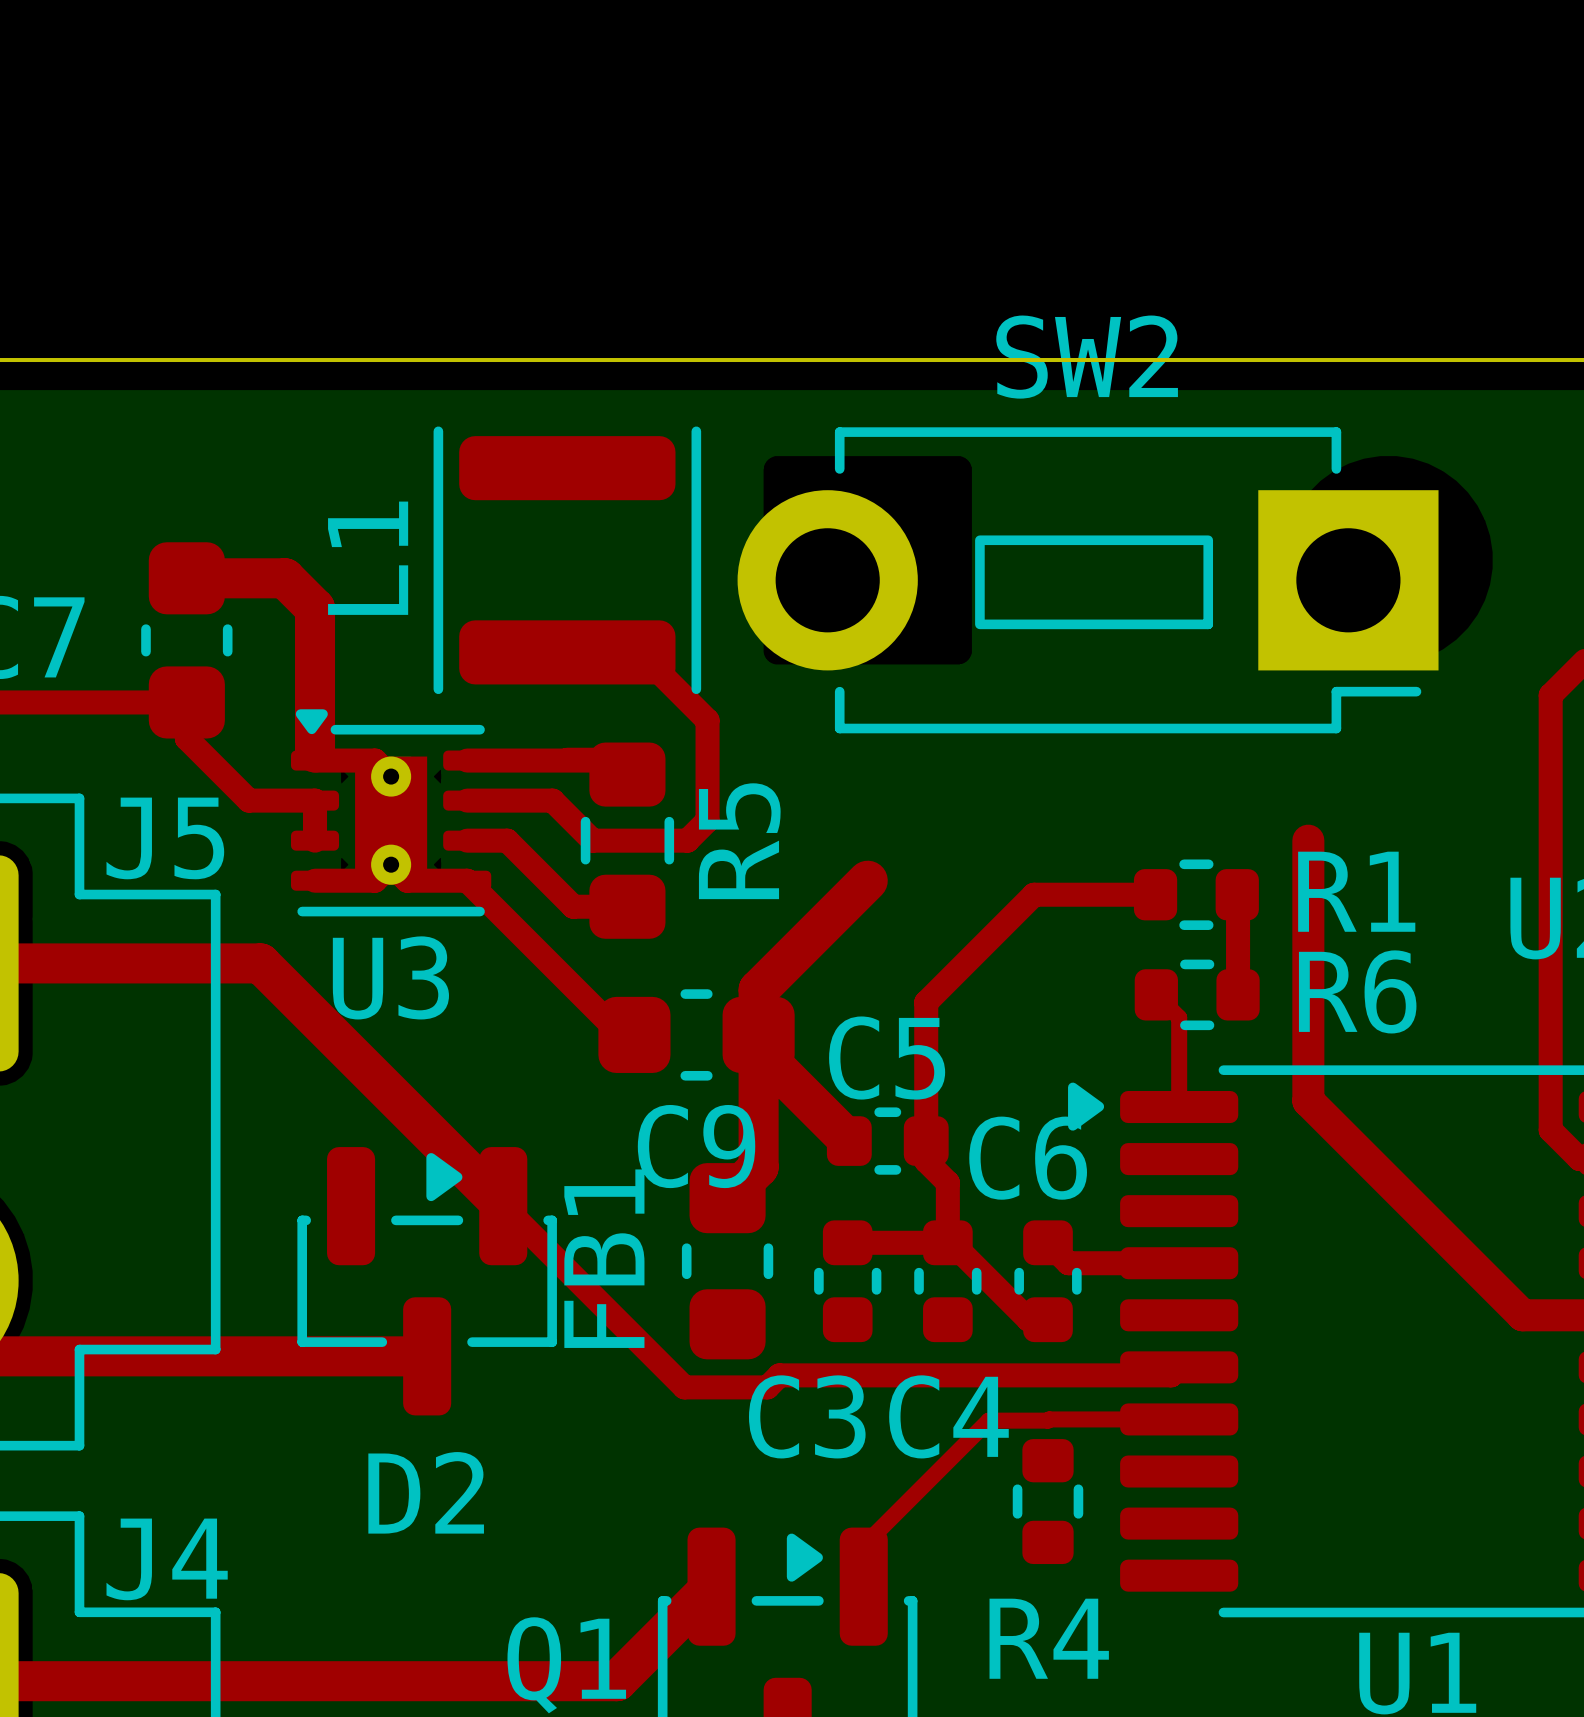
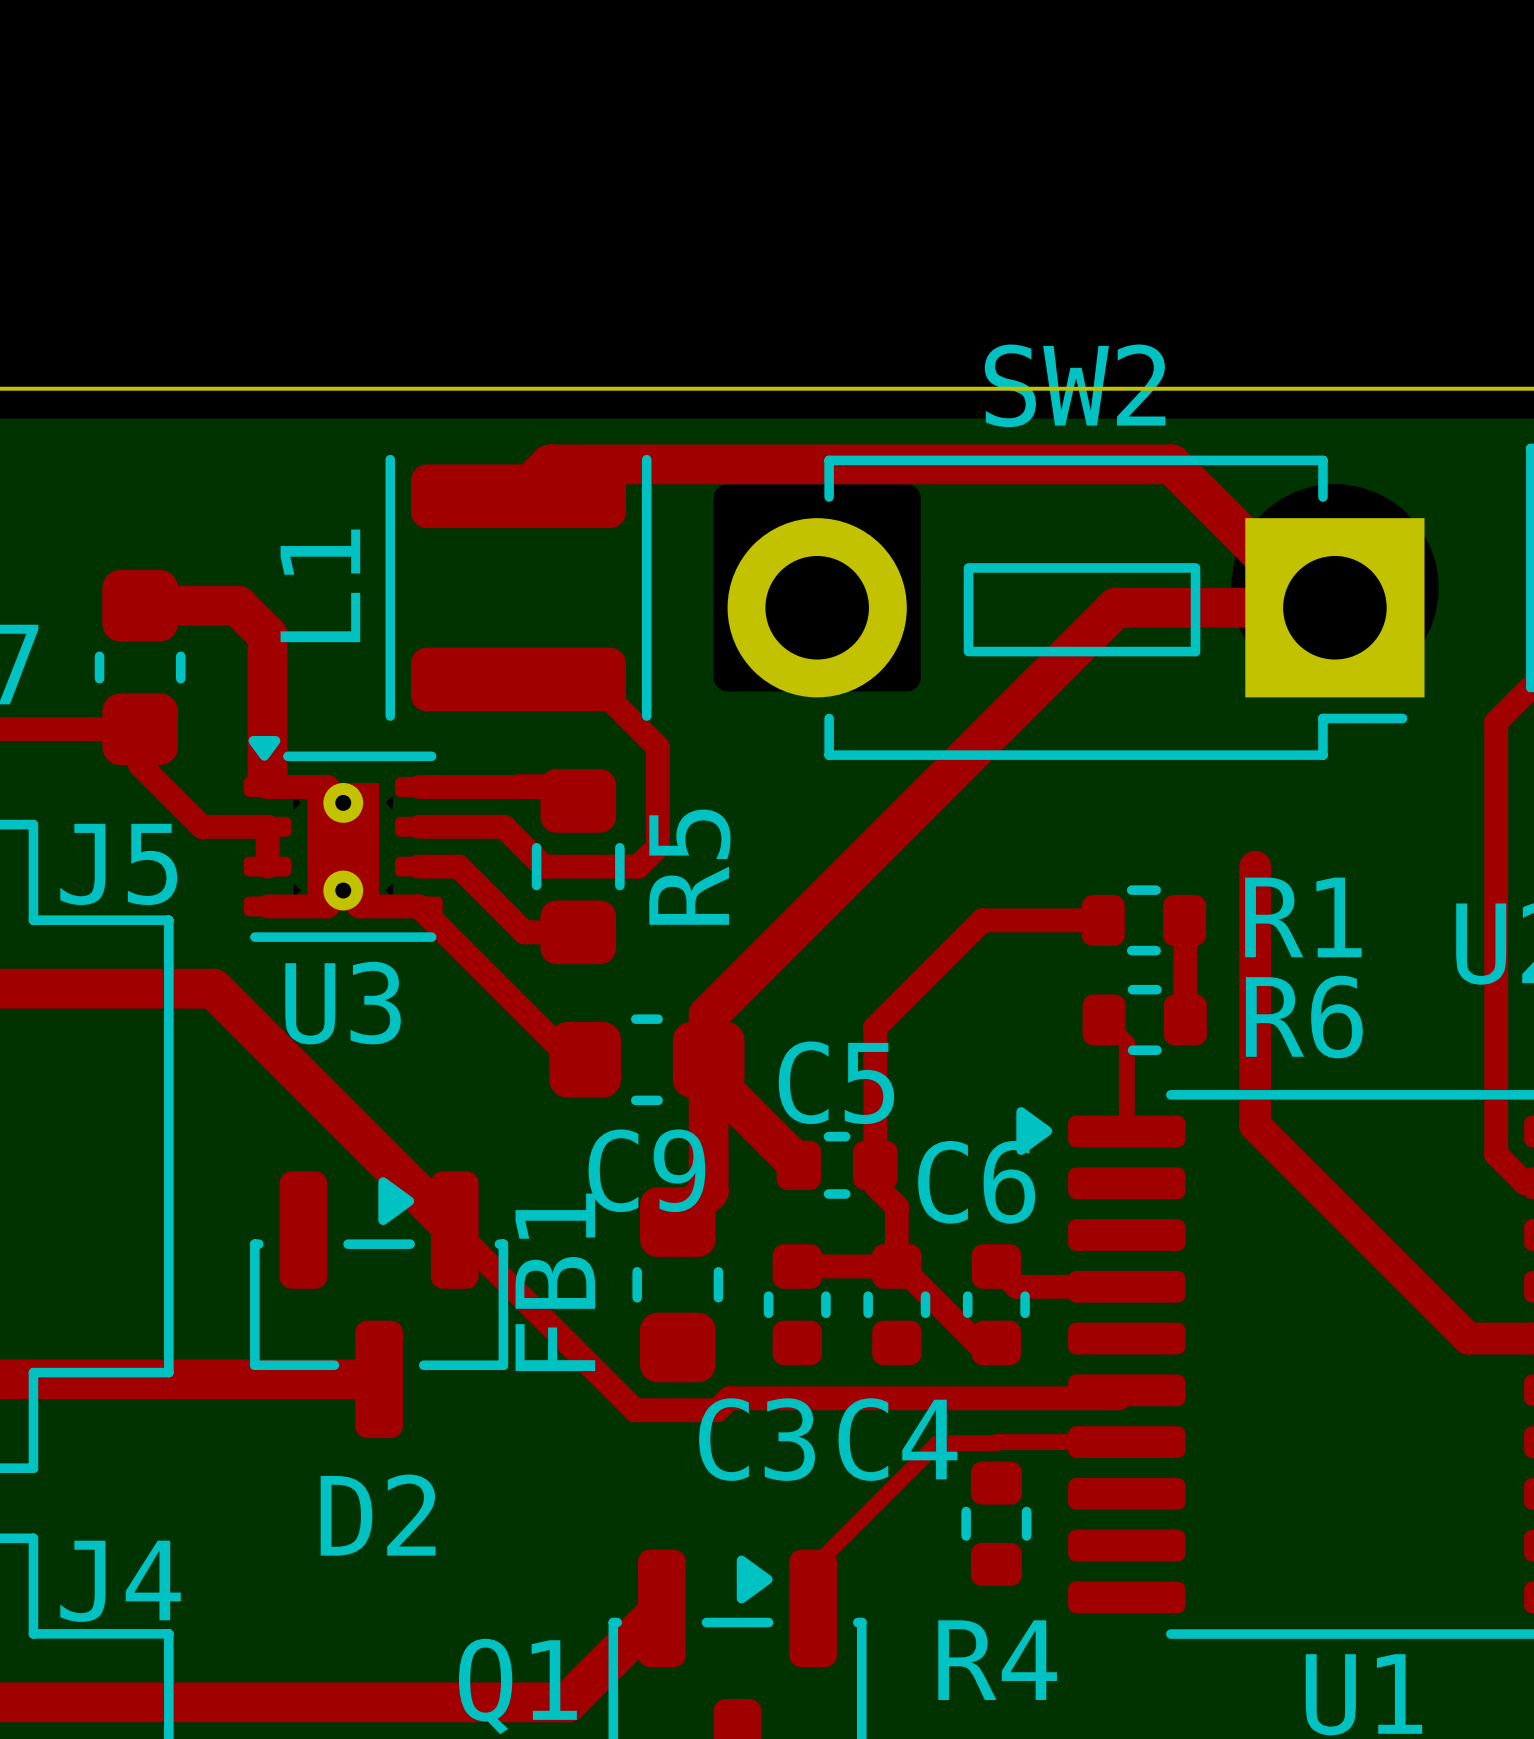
top track: none -> (518, 496) (550, 464) (1171, 464) (1314, 607) (1115, 607) (817, 906)
SW2 position: (1088, 580) -> (1076, 607)

